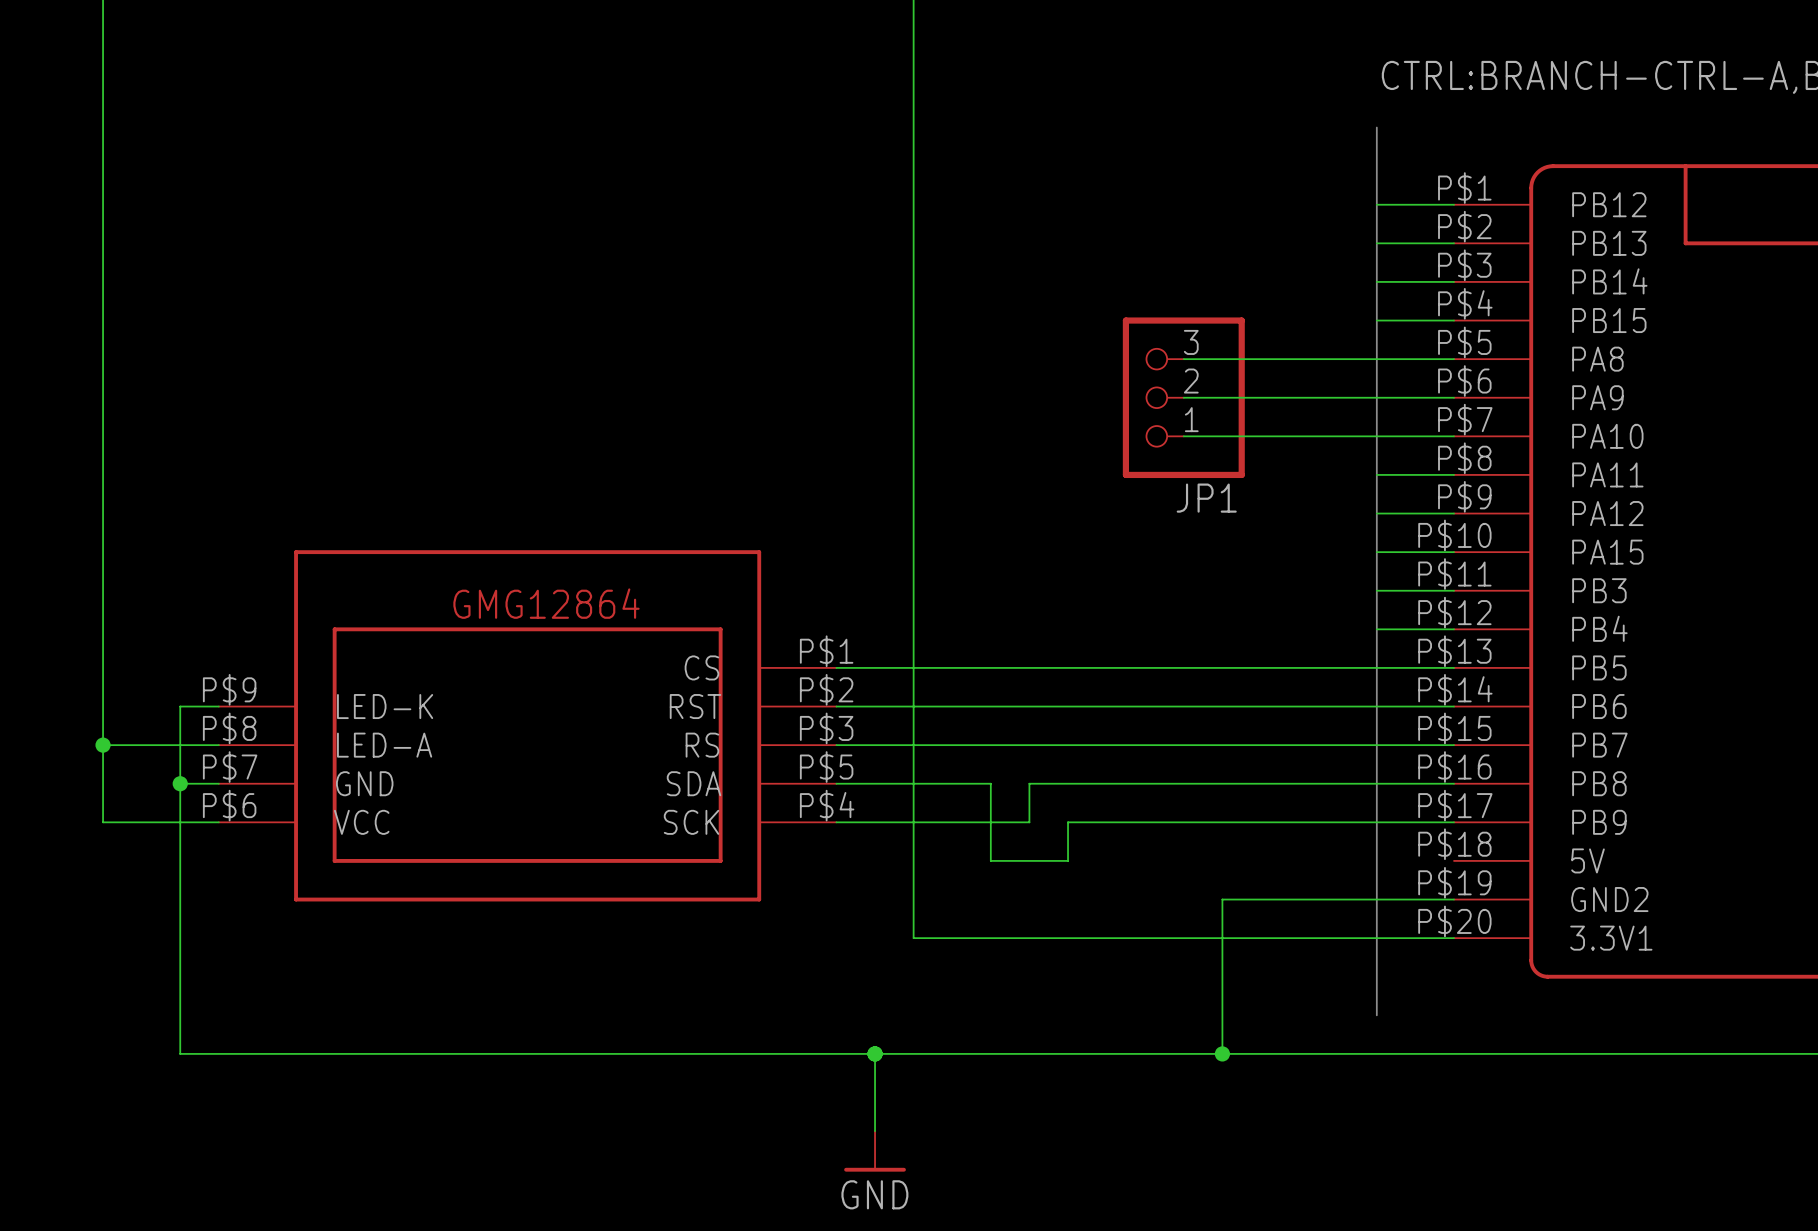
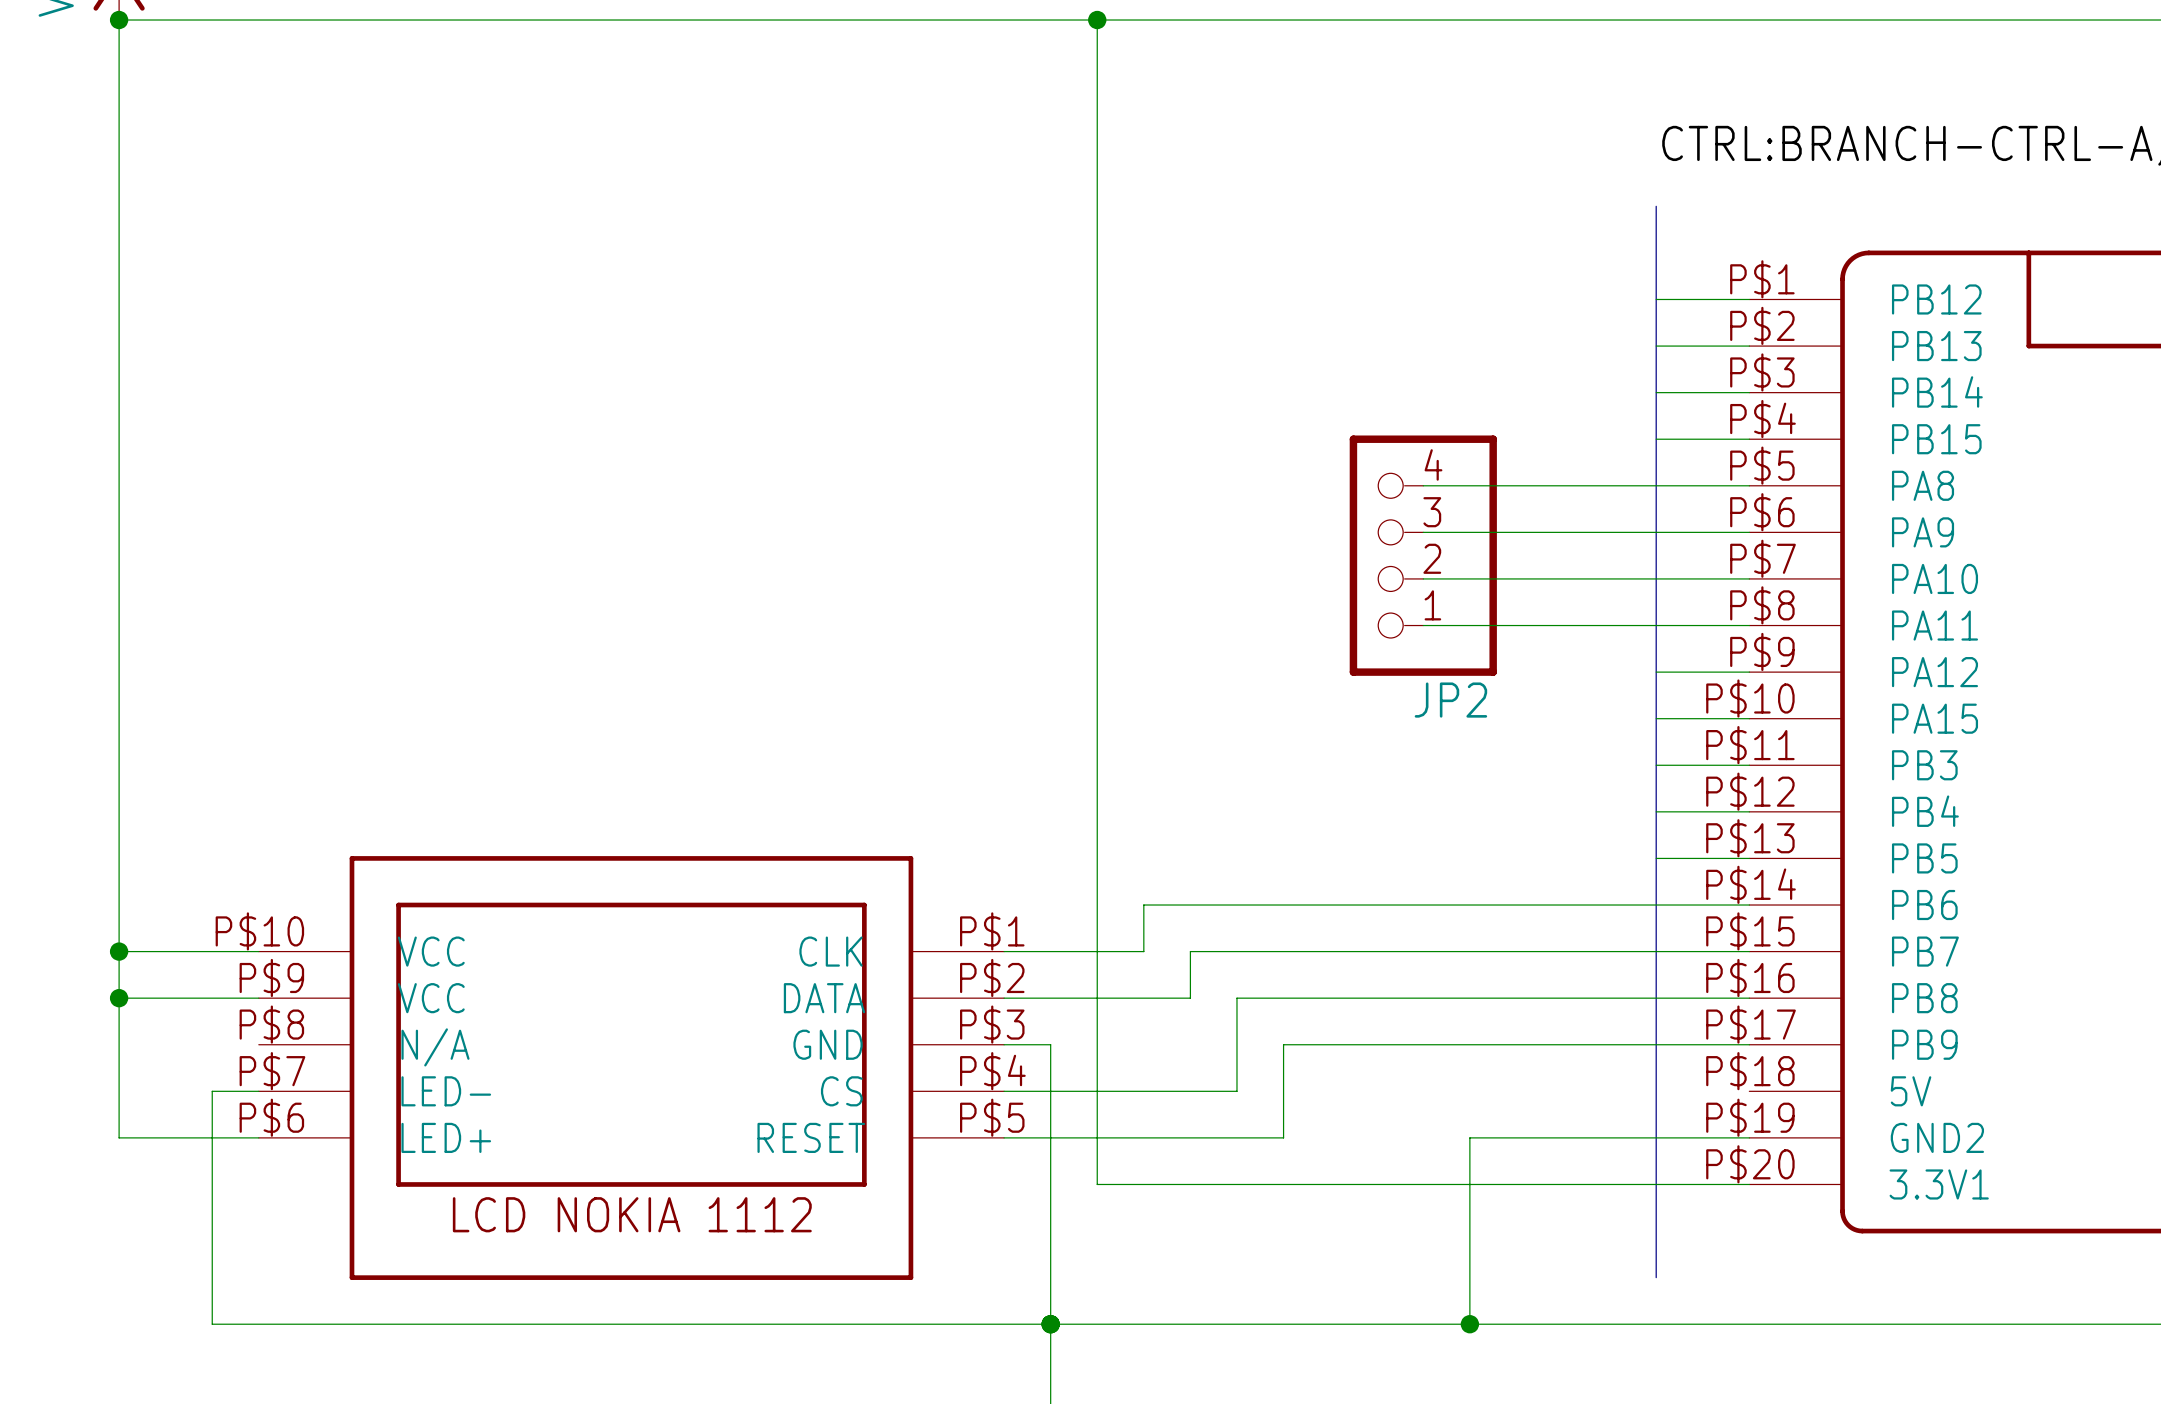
JP1: (1183, 397) -> none
JP2: none -> (1423, 555)
wire: none -> (1423, 625) (1656, 625)
wire: (836, 667) (1376, 667) -> none
wire: (218, 706) (180, 706) (180, 860) -> (258, 1091) (212, 1091)
wire: (836, 706) (952, 706) -> none
part: (527, 725) -> none
wire: (952, 745) (990, 745) -> (1143, 951) (1143, 905)
wire: none -> (119, 998) (212, 998)
junction position: (180, 783) -> (119, 998)
wire: (990, 783) (990, 860) -> (1190, 998) (1190, 951)
wire: (103, 822) (218, 822) -> (119, 1044) (119, 1137) (258, 1137)
wire: (875, 822) (1029, 822) -> (1050, 1044) (1050, 1324)
part: none -> (631, 1068)
wire: none -> (1004, 1091) (1190, 1091)
wire: (1029, 860) (1068, 860) -> (1236, 1091) (1236, 1044)
wire: none -> (1283, 1091) (1283, 1137) (1004, 1137)

